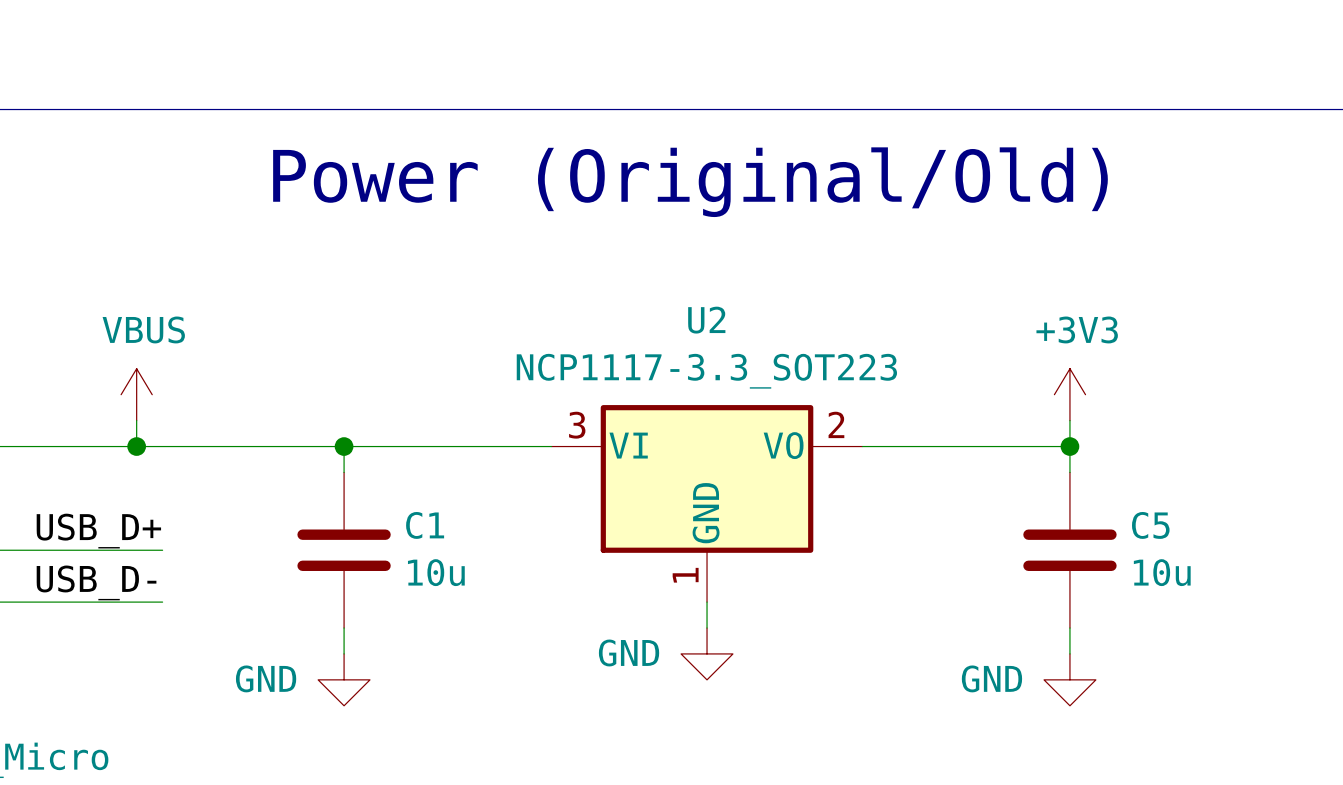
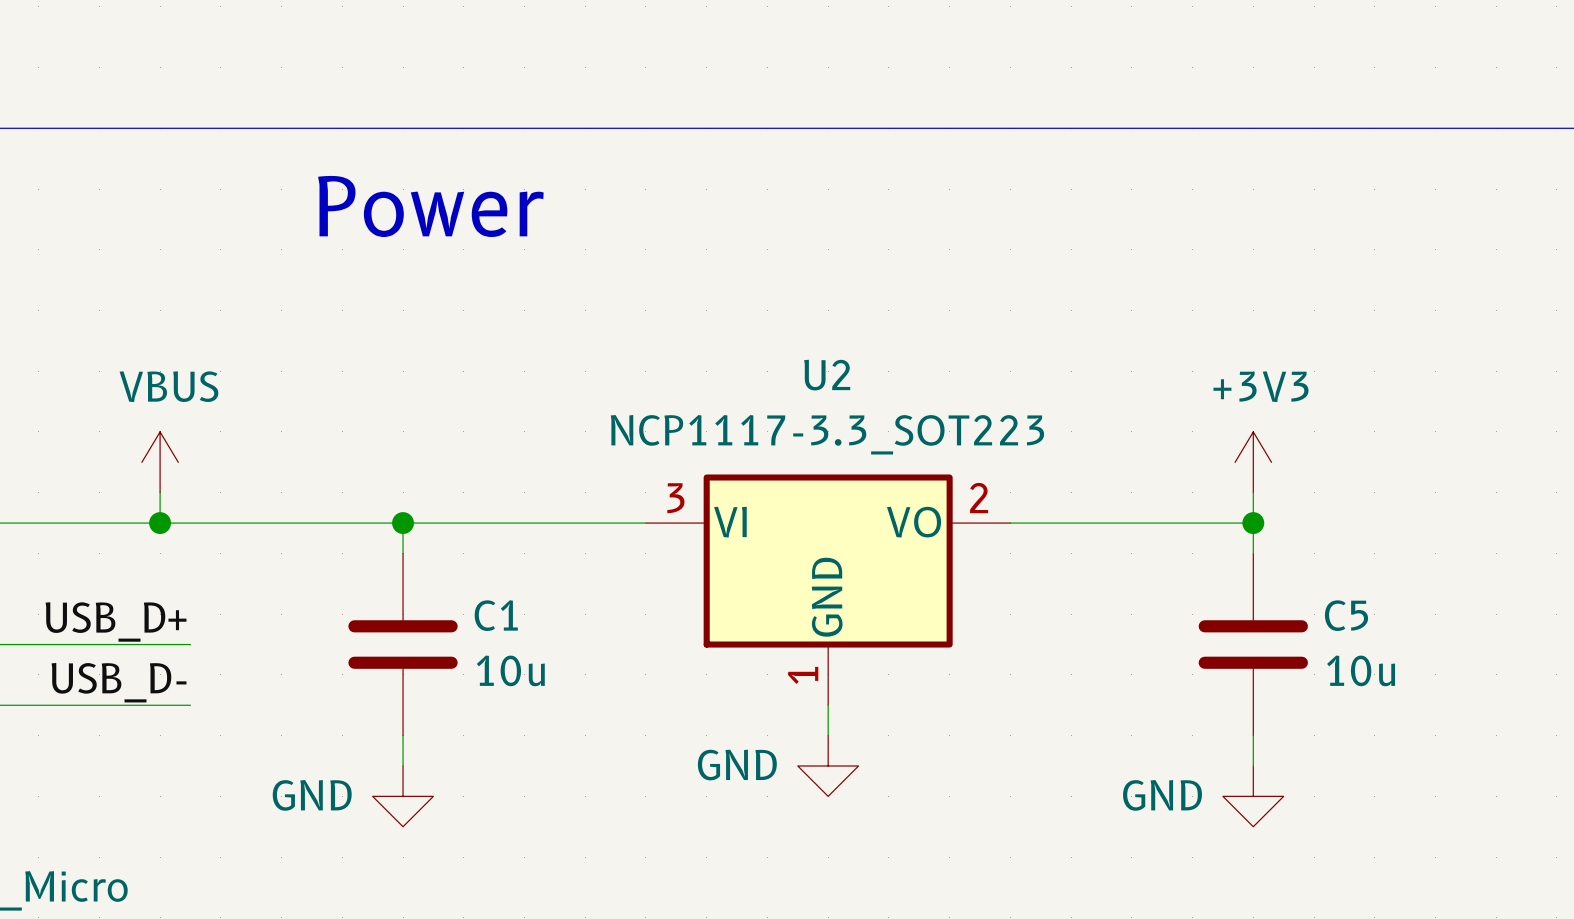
text: Power (Original/Old) (690, 182) -> Power (430, 206)

